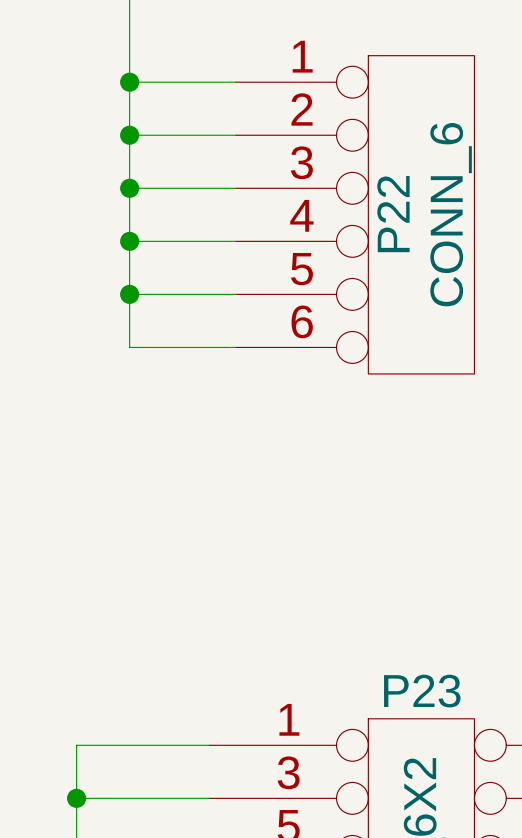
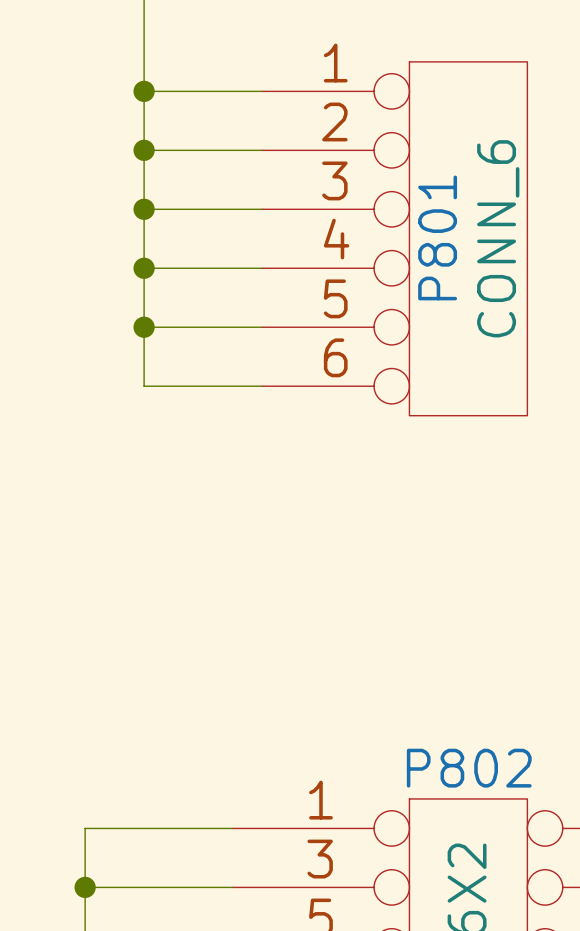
P22 name: P22 (393, 214) -> P801 (437, 237)
P23 name: P23 (422, 691) -> P802 (469, 768)

